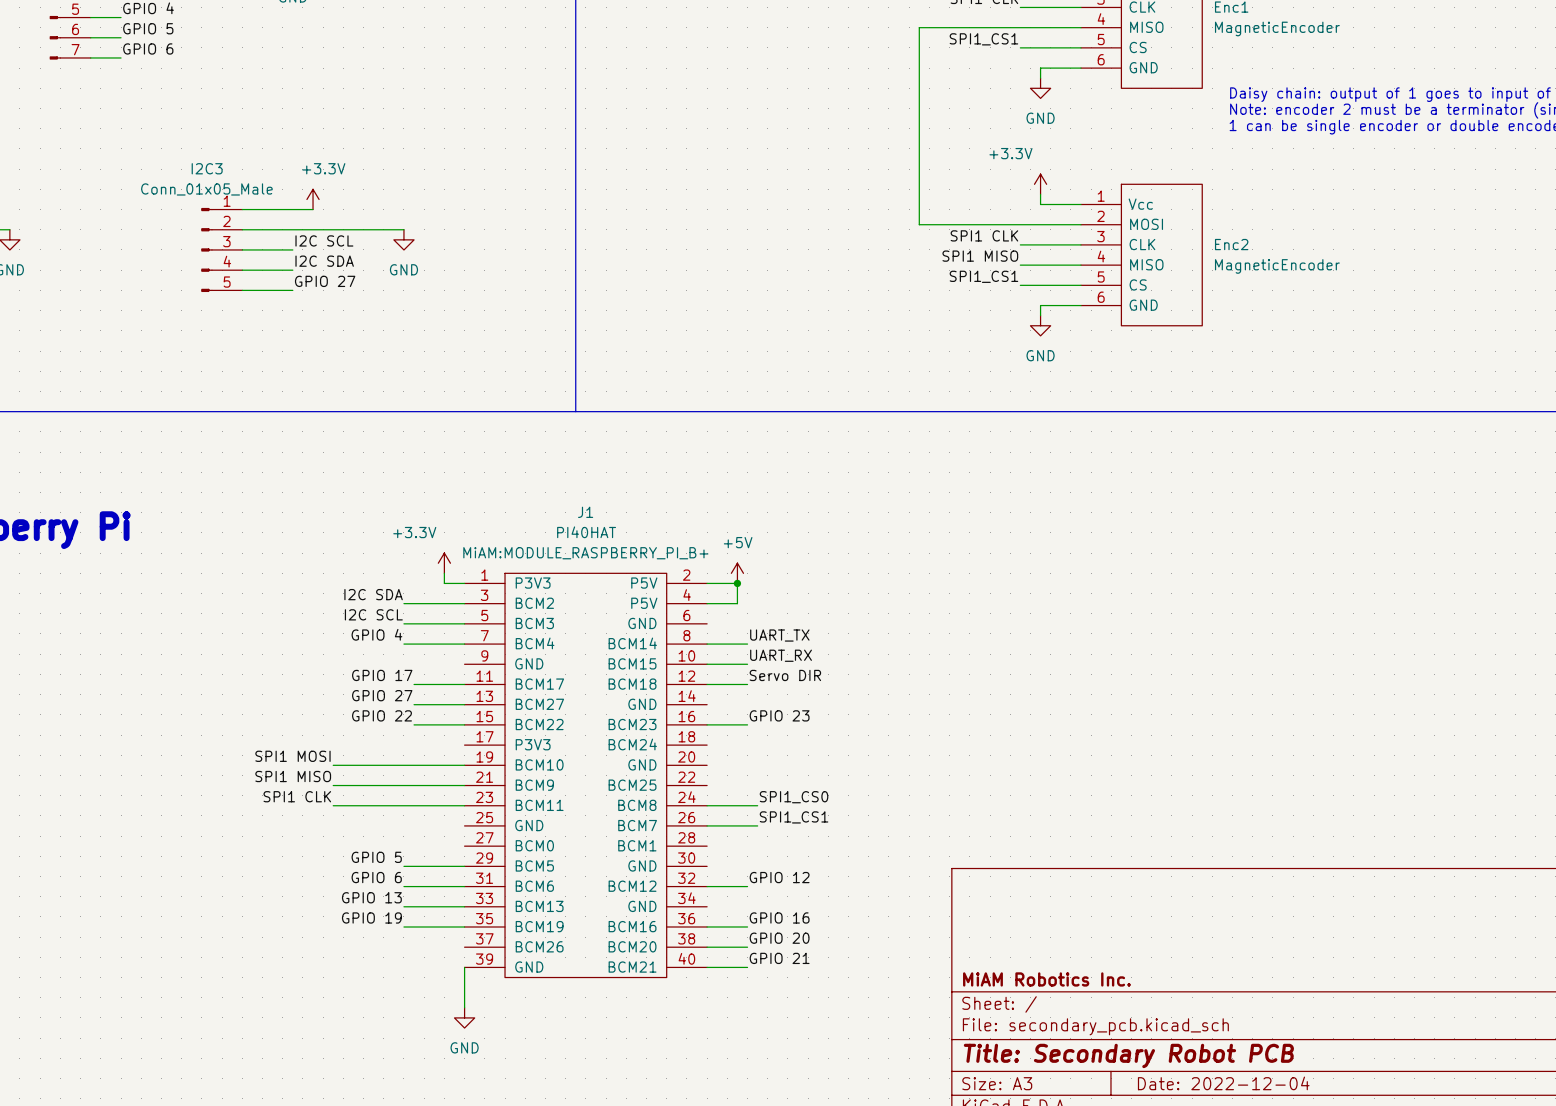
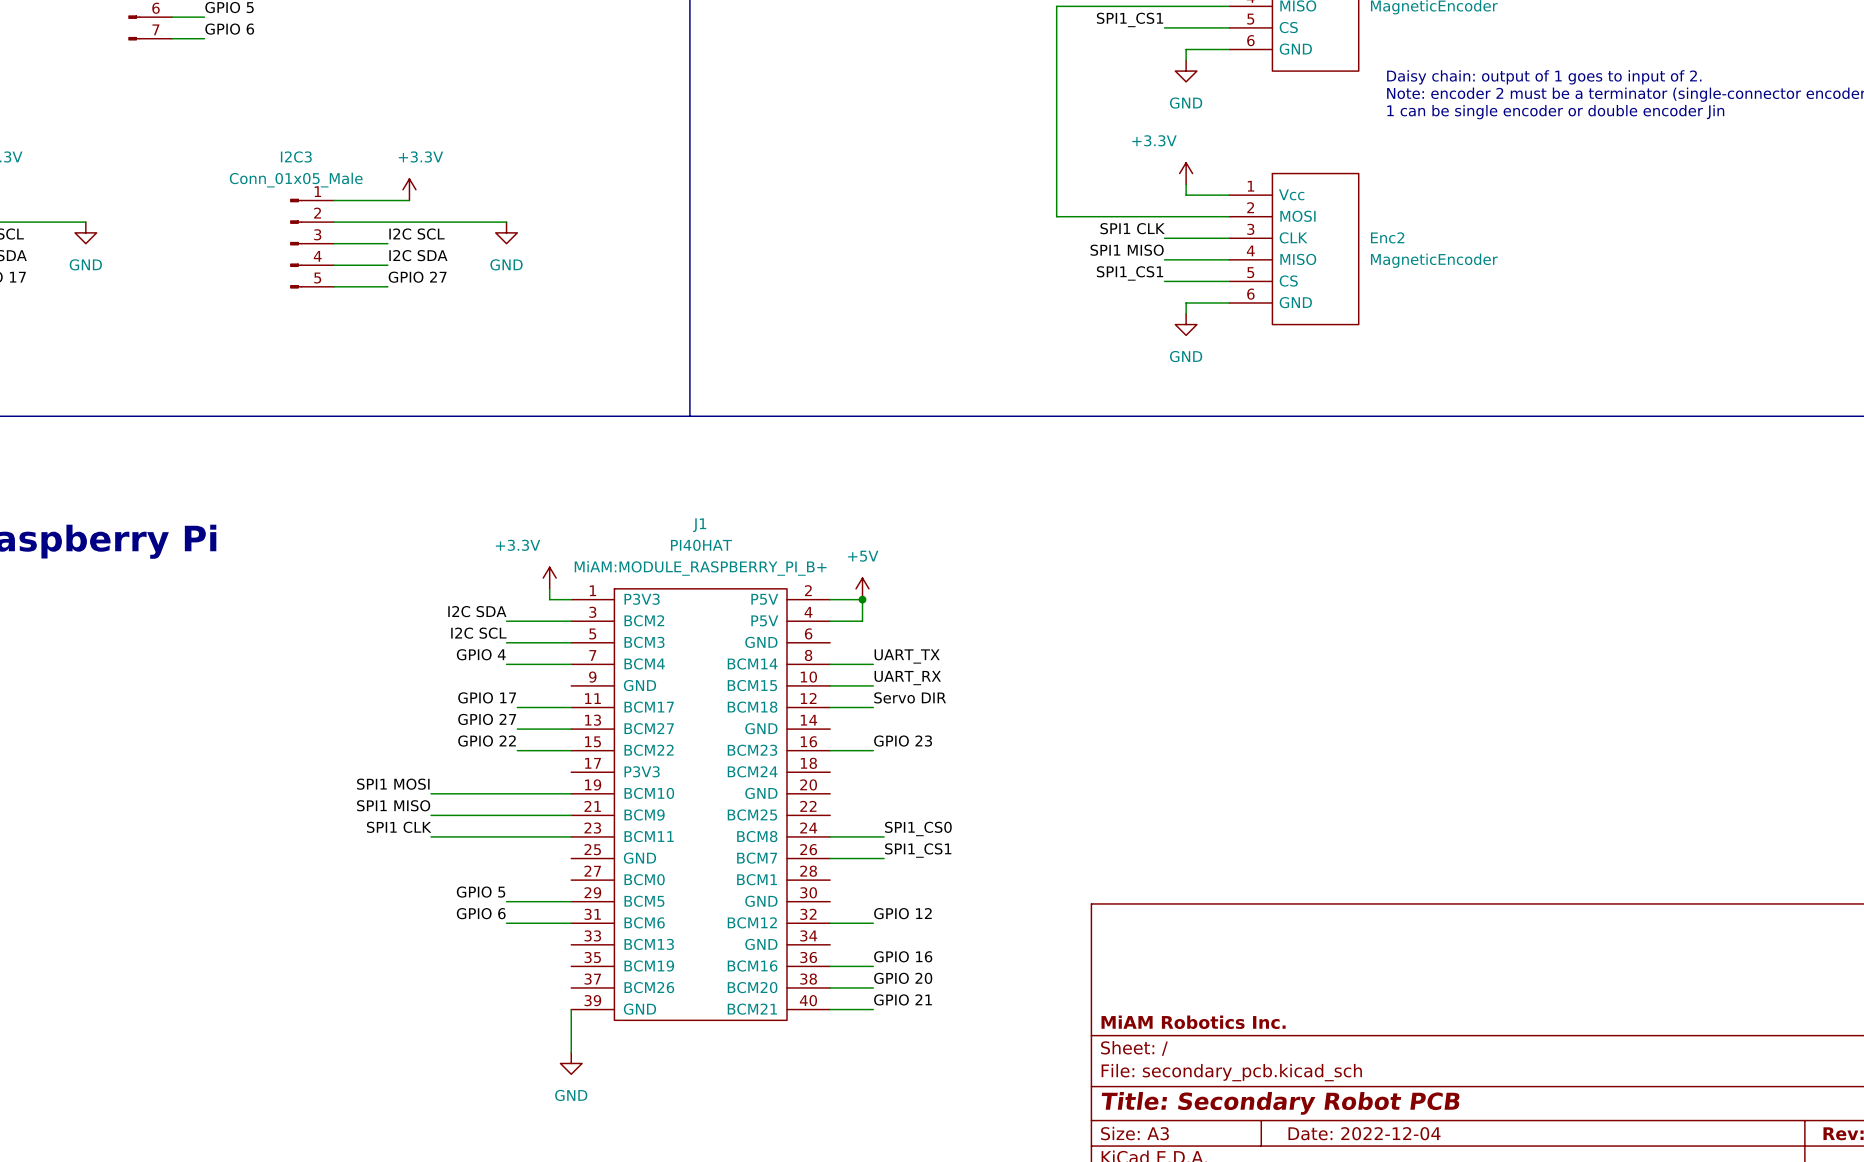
label: GPIO 13 (371, 897) -> none
wire: (403, 906) (464, 906) -> none
label: GPIO 19 (371, 917) -> none
wire: (403, 926) (464, 926) -> none

